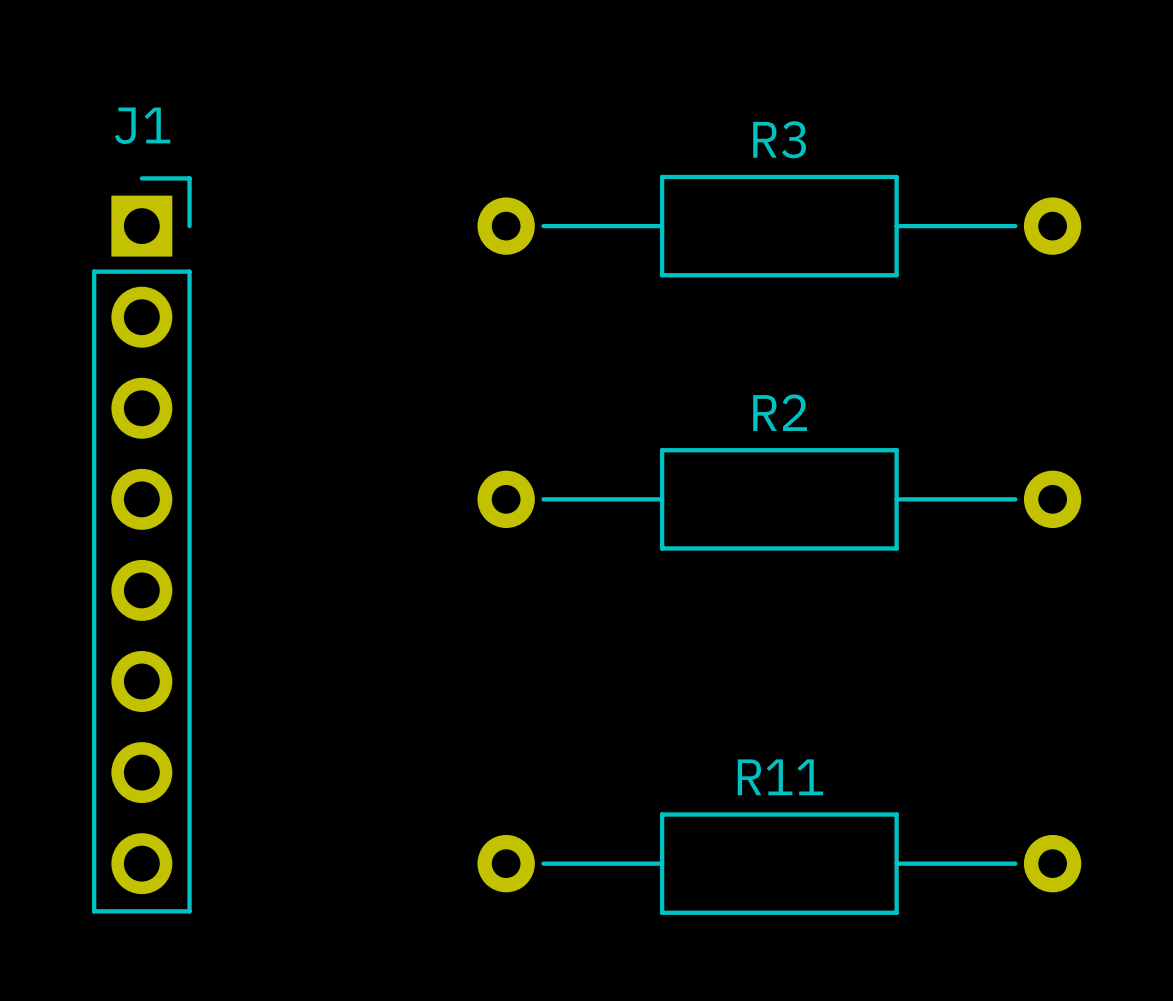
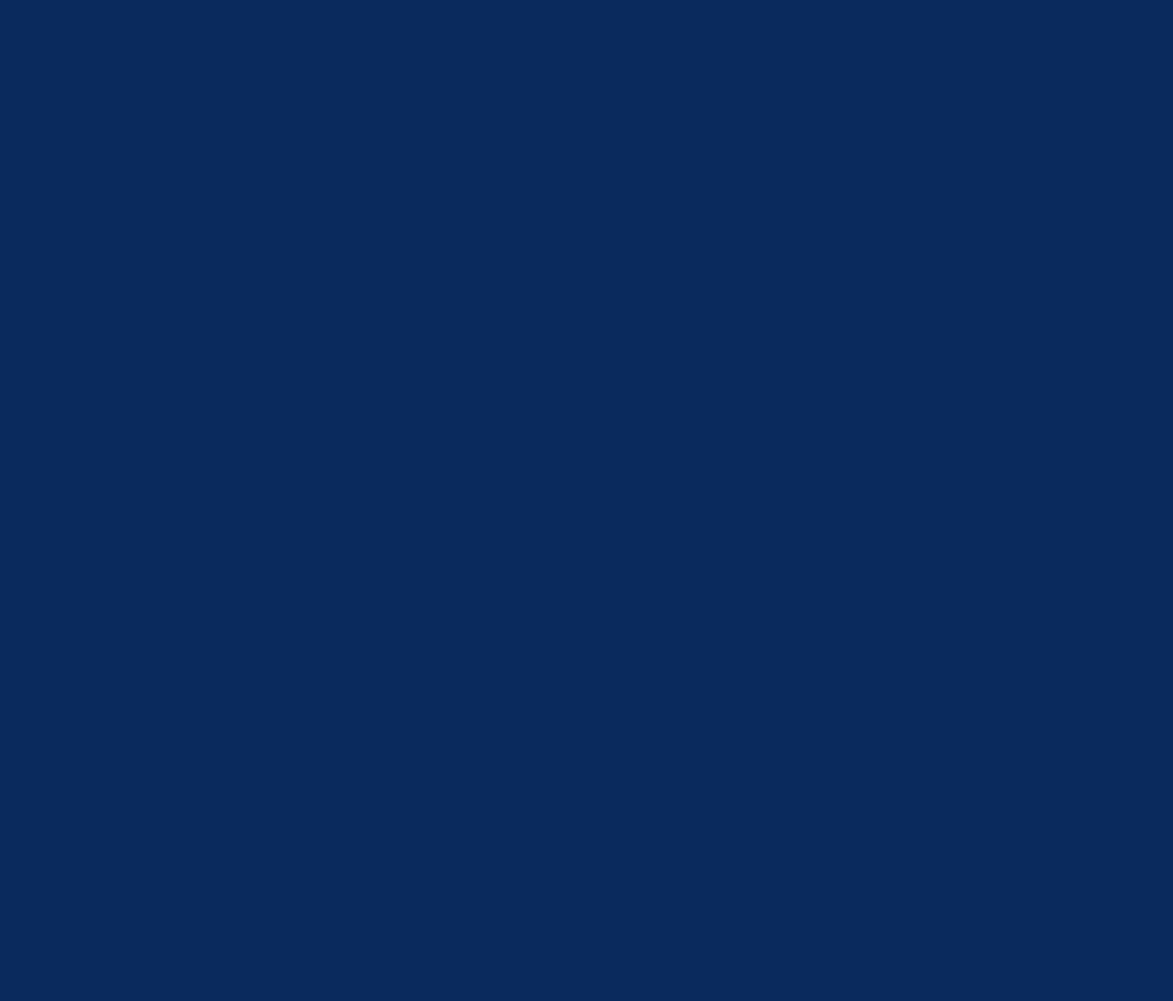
R3: (779, 226) -> none
R2: (779, 499) -> none
J1: (141, 544) -> none
R11: (779, 863) -> none

